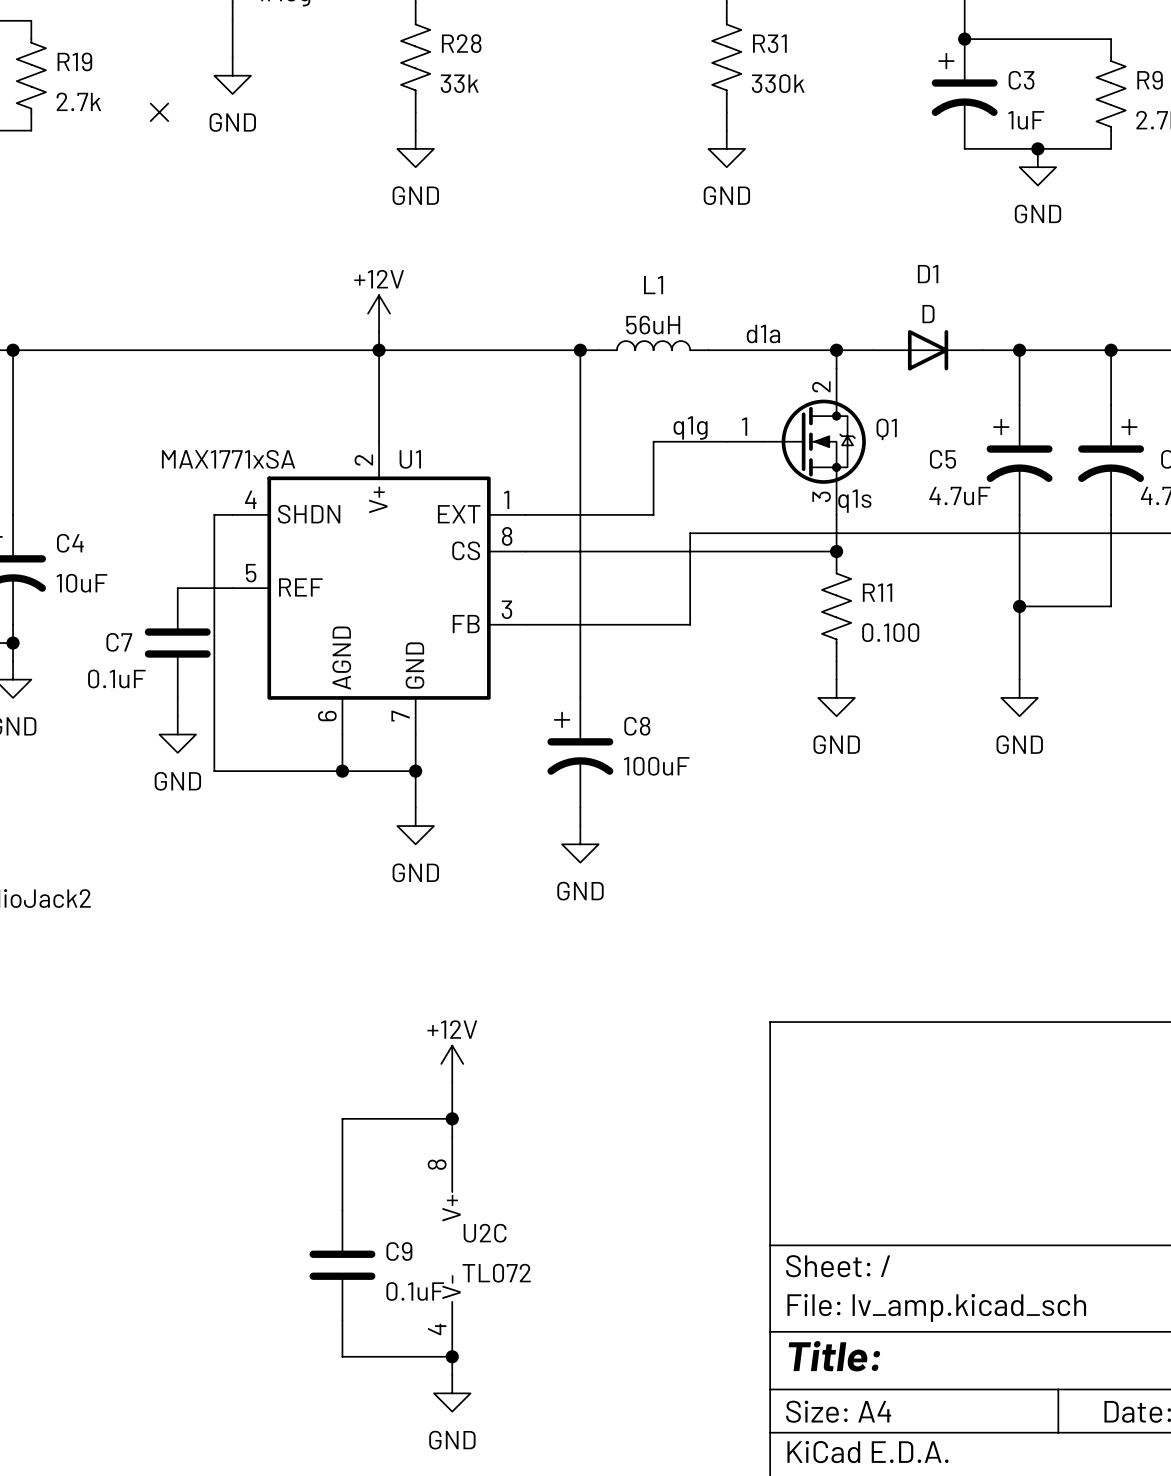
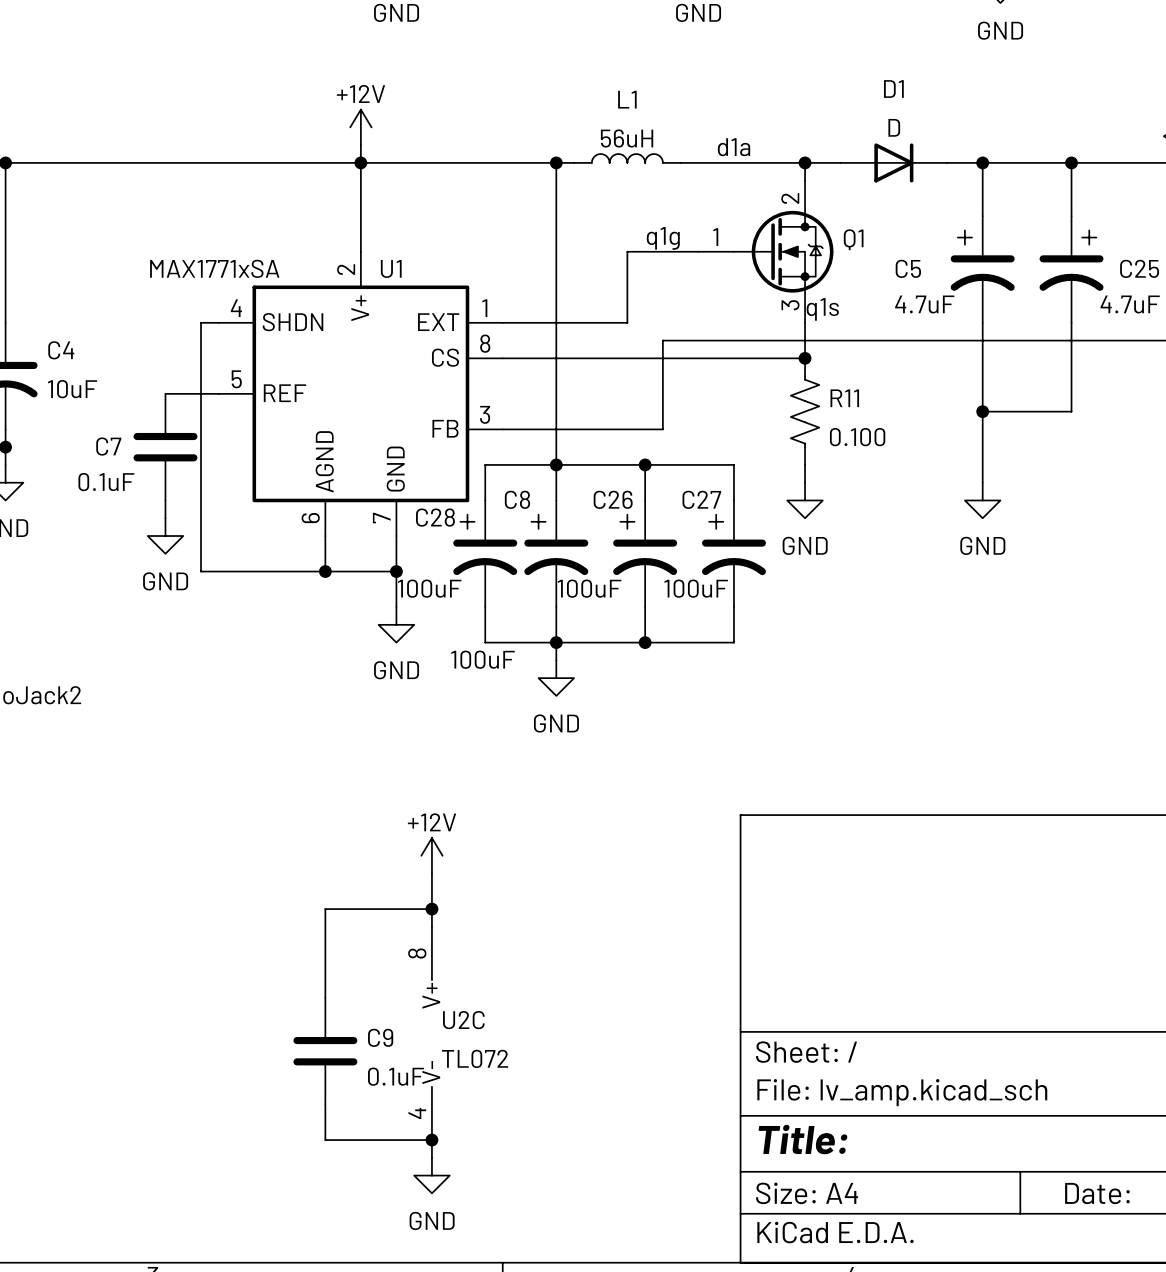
junction: none -> (556, 464)
wire: none -> (645, 464) (645, 500)
junction: none -> (645, 464)
wire: none -> (485, 500) (485, 464) (733, 464) (733, 500)
C8 name position: C8 (637, 726) -> C8 (517, 499)
C28: none -> 100uF (485, 553)
C26: none -> 100uF (645, 553)
C27: none -> 100uF (733, 553)
C8 value position: 100uF (656, 766) -> 100uF (482, 659)
wire: none -> (485, 607) (485, 642) (733, 642) (733, 607)
wire: none -> (645, 607) (645, 642)
power symbol position: GND (580, 844) -> GND (556, 678)
junction: none -> (556, 642)
junction: none -> (645, 642)

